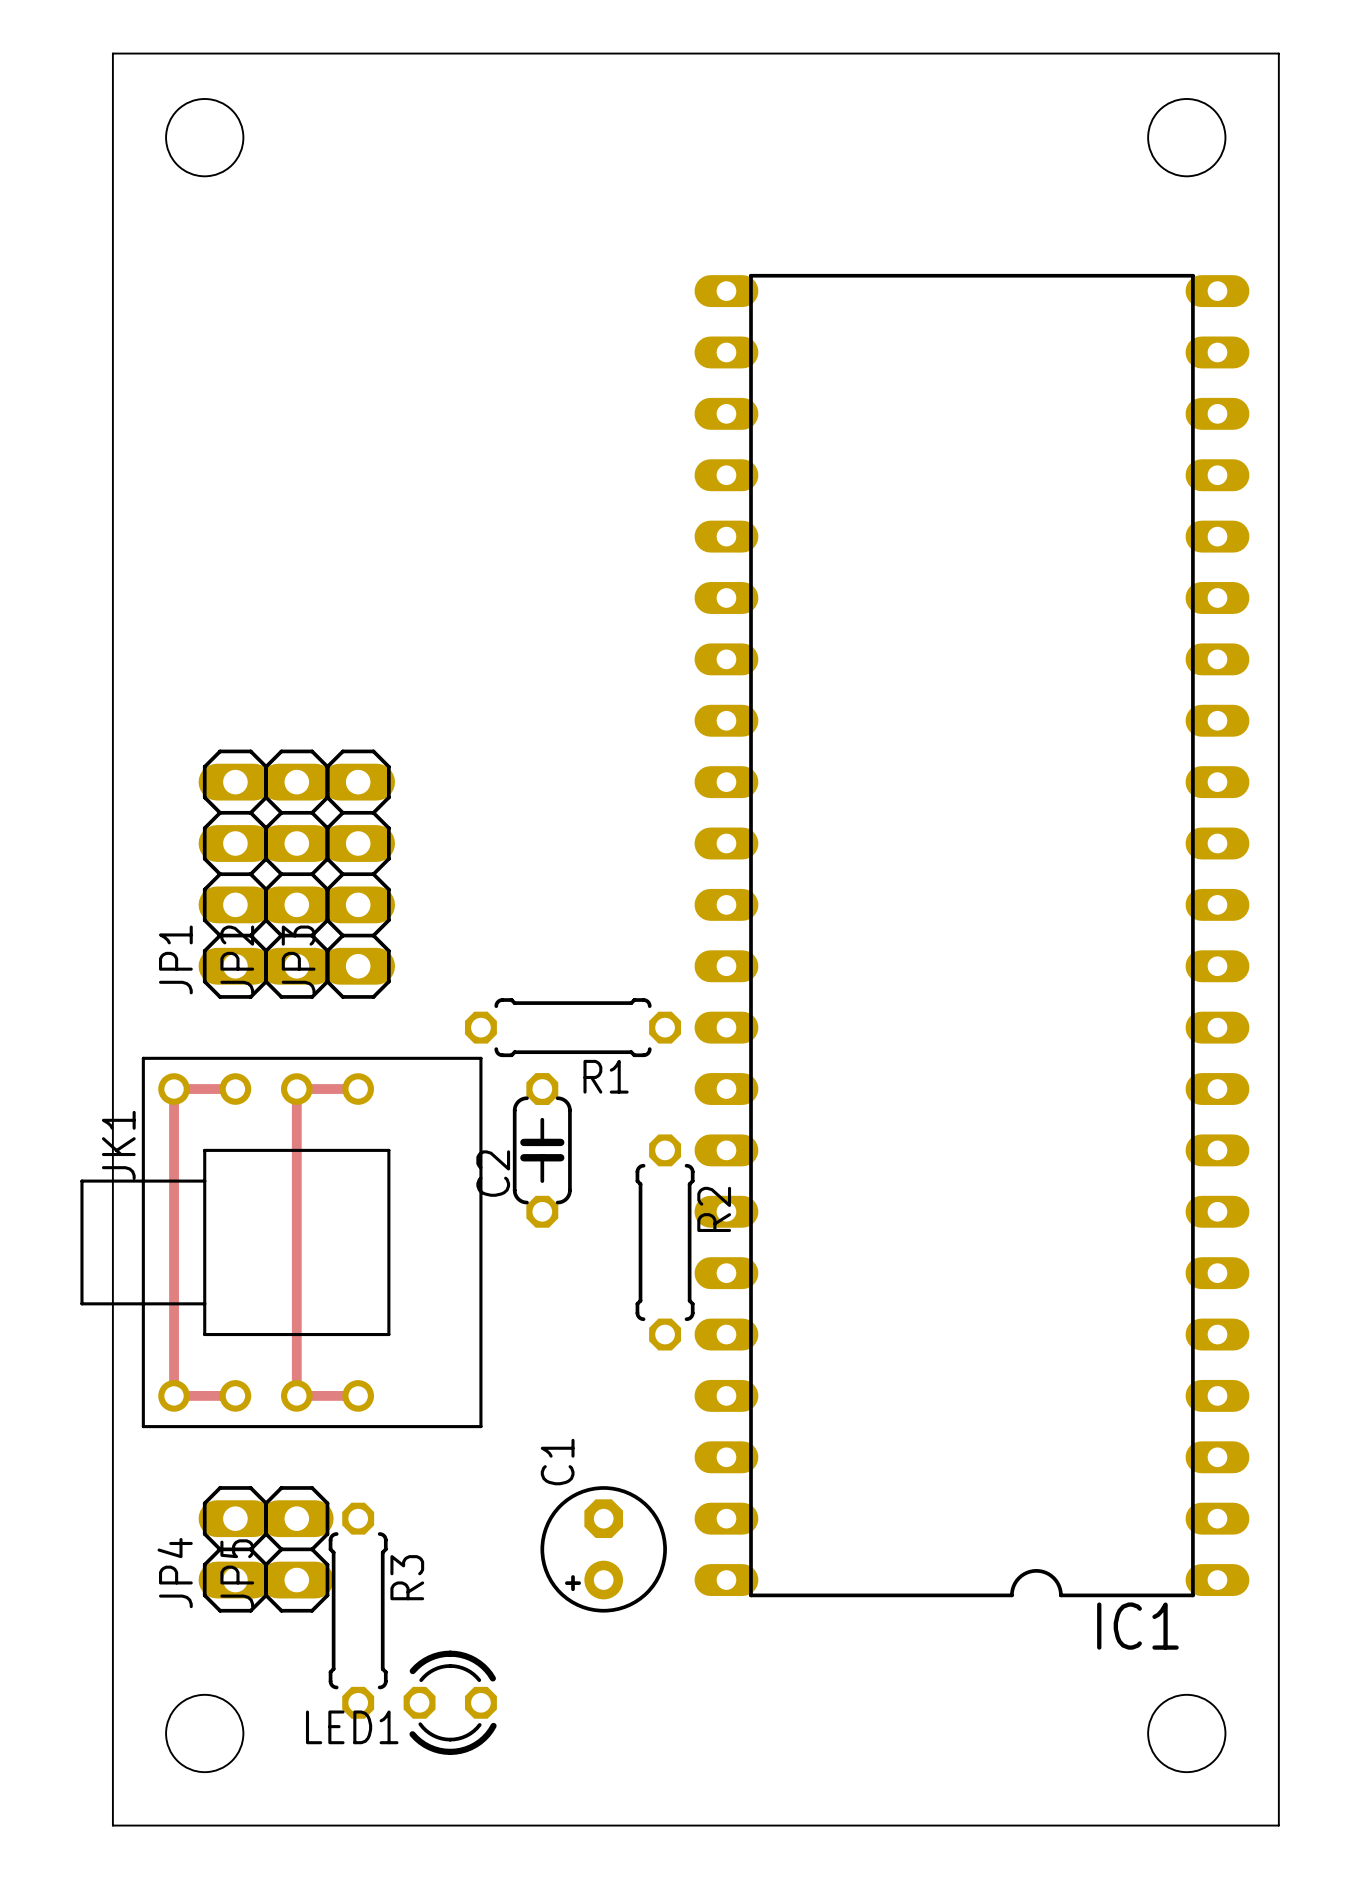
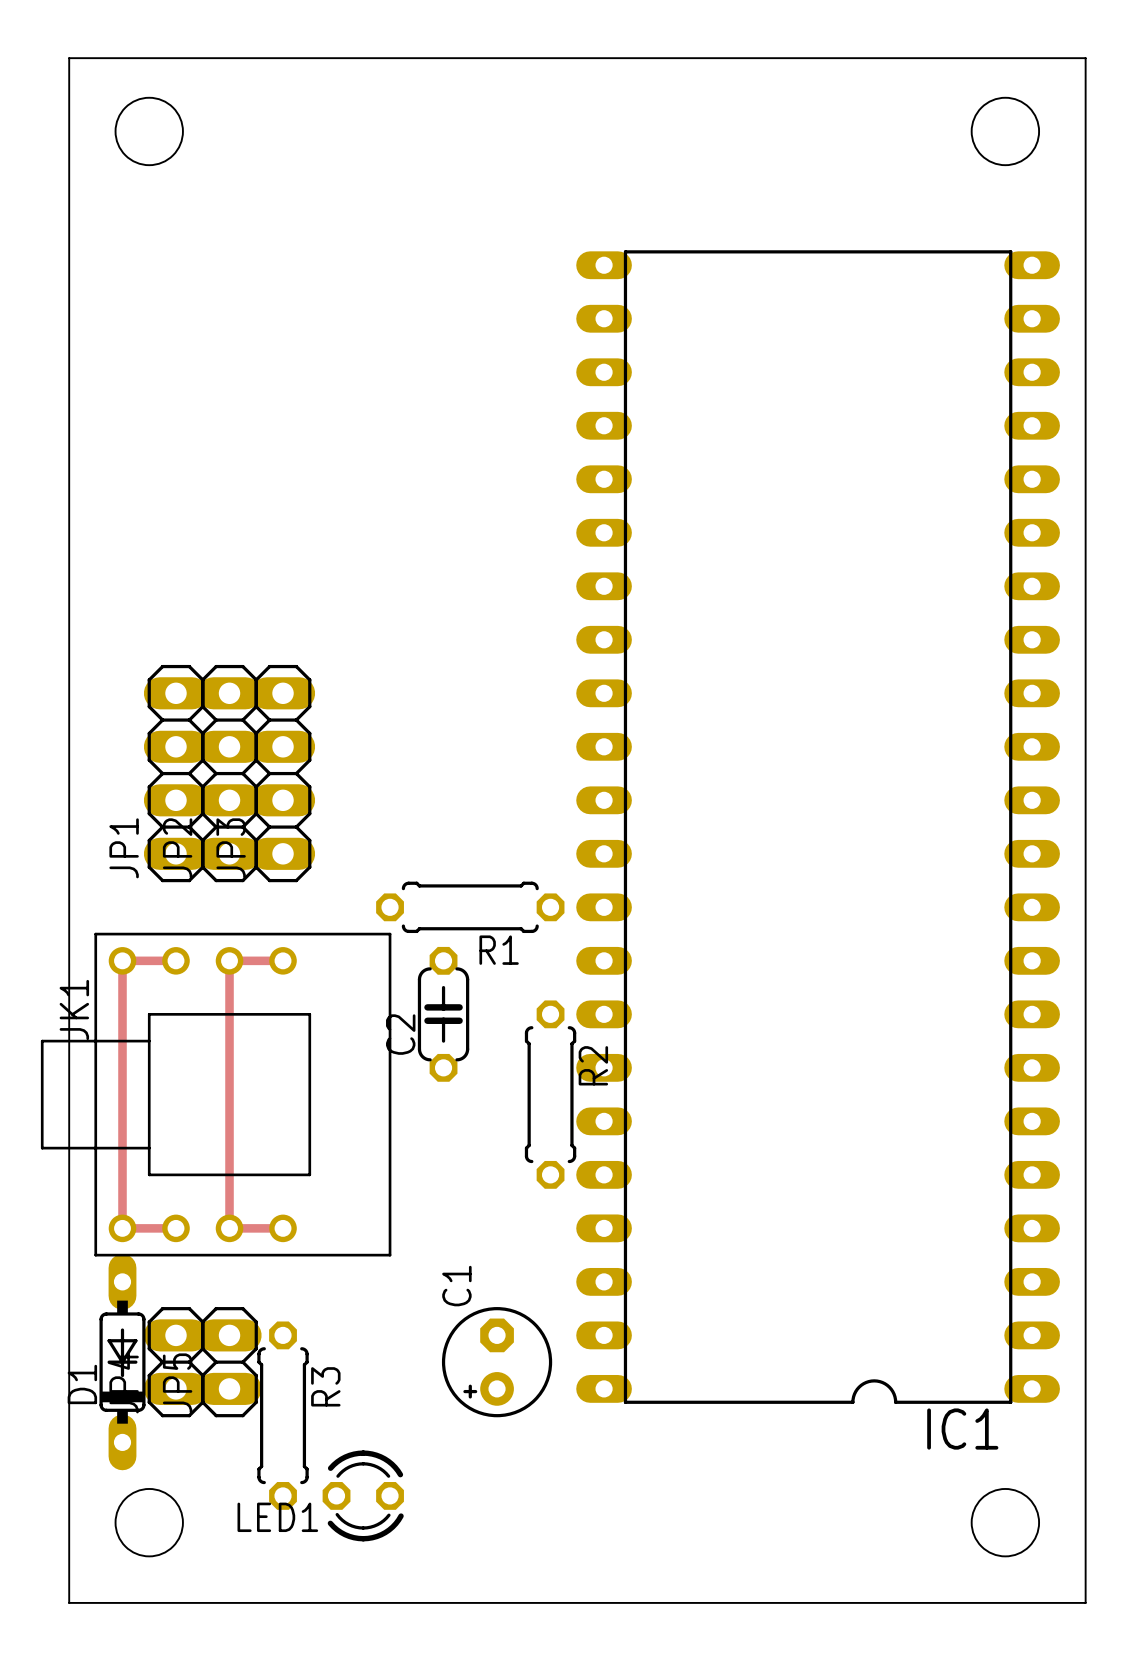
D1: none -> (122, 1362)

